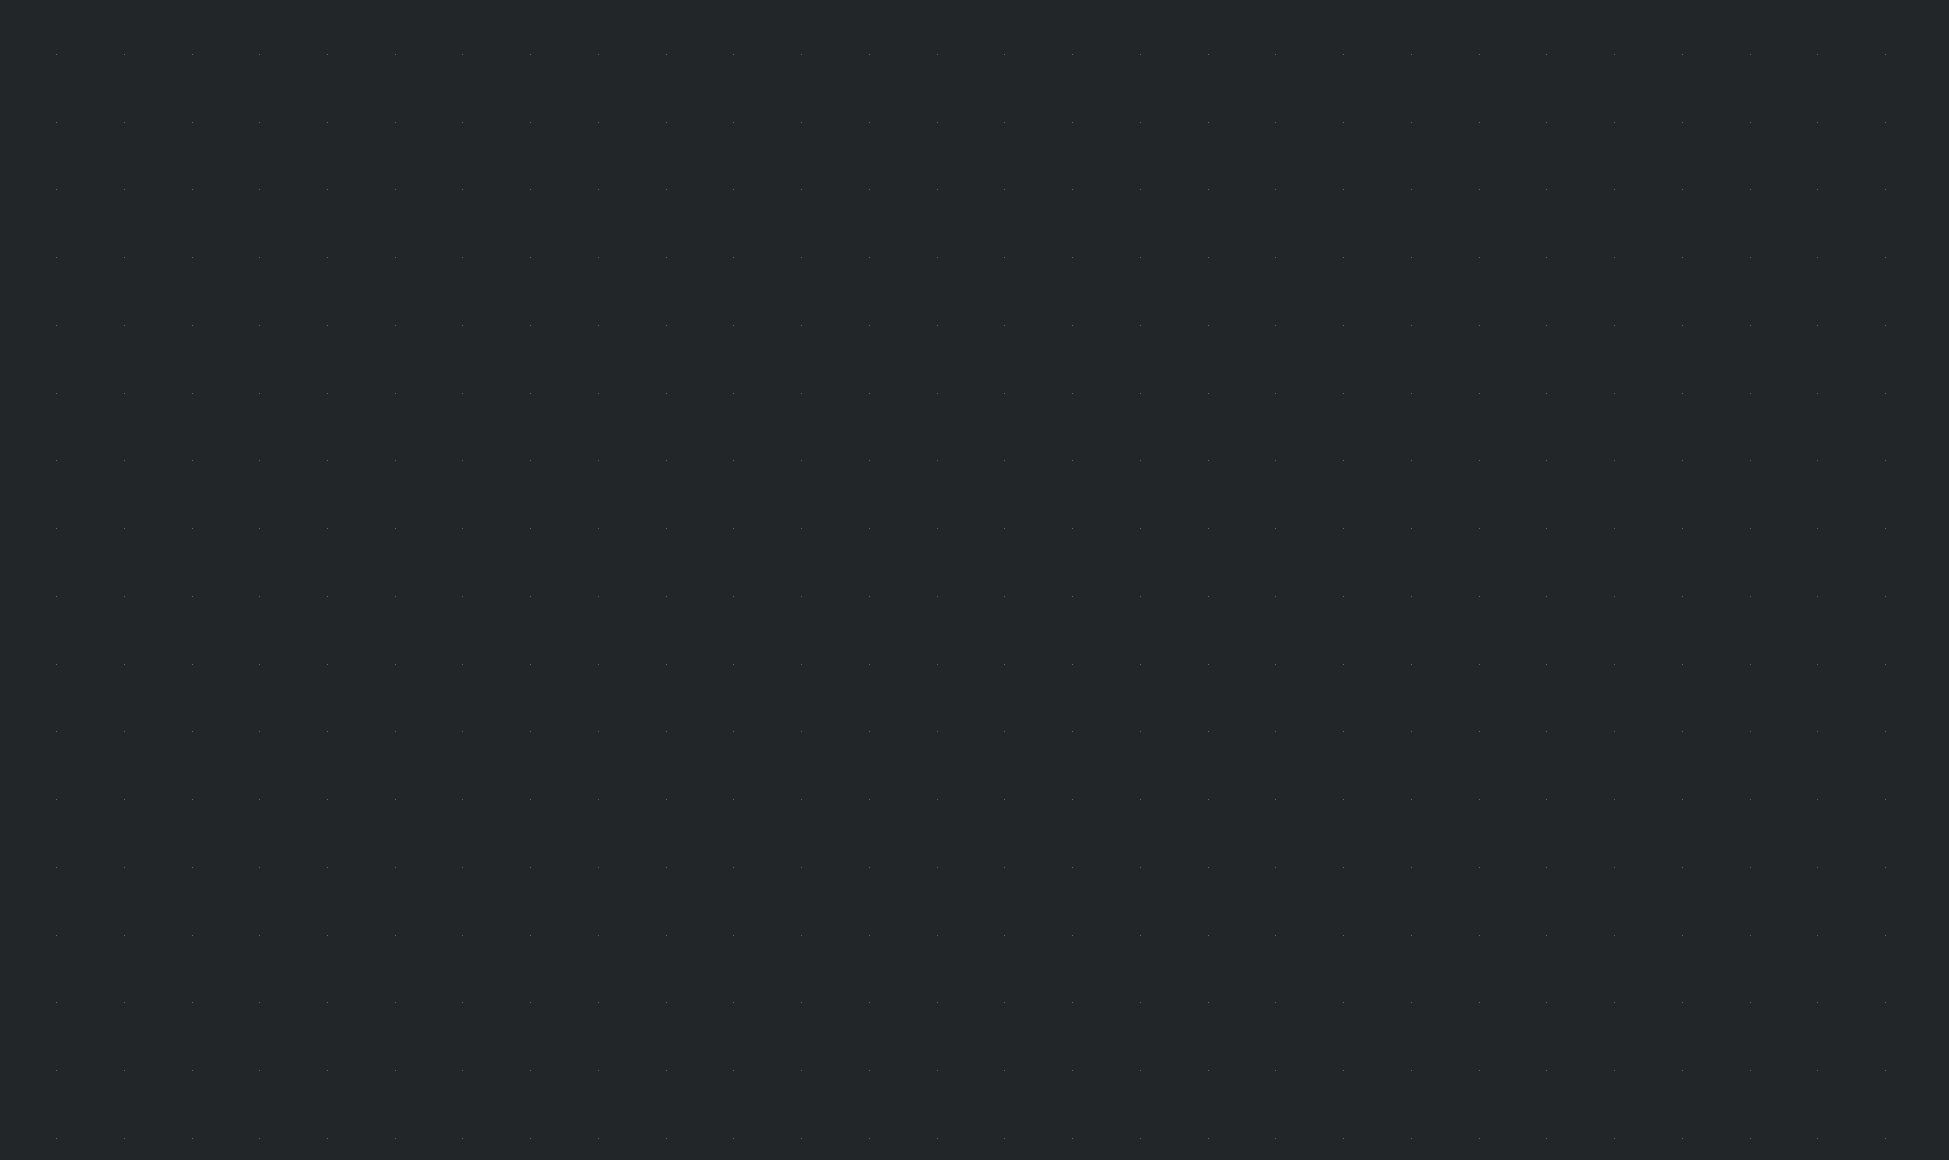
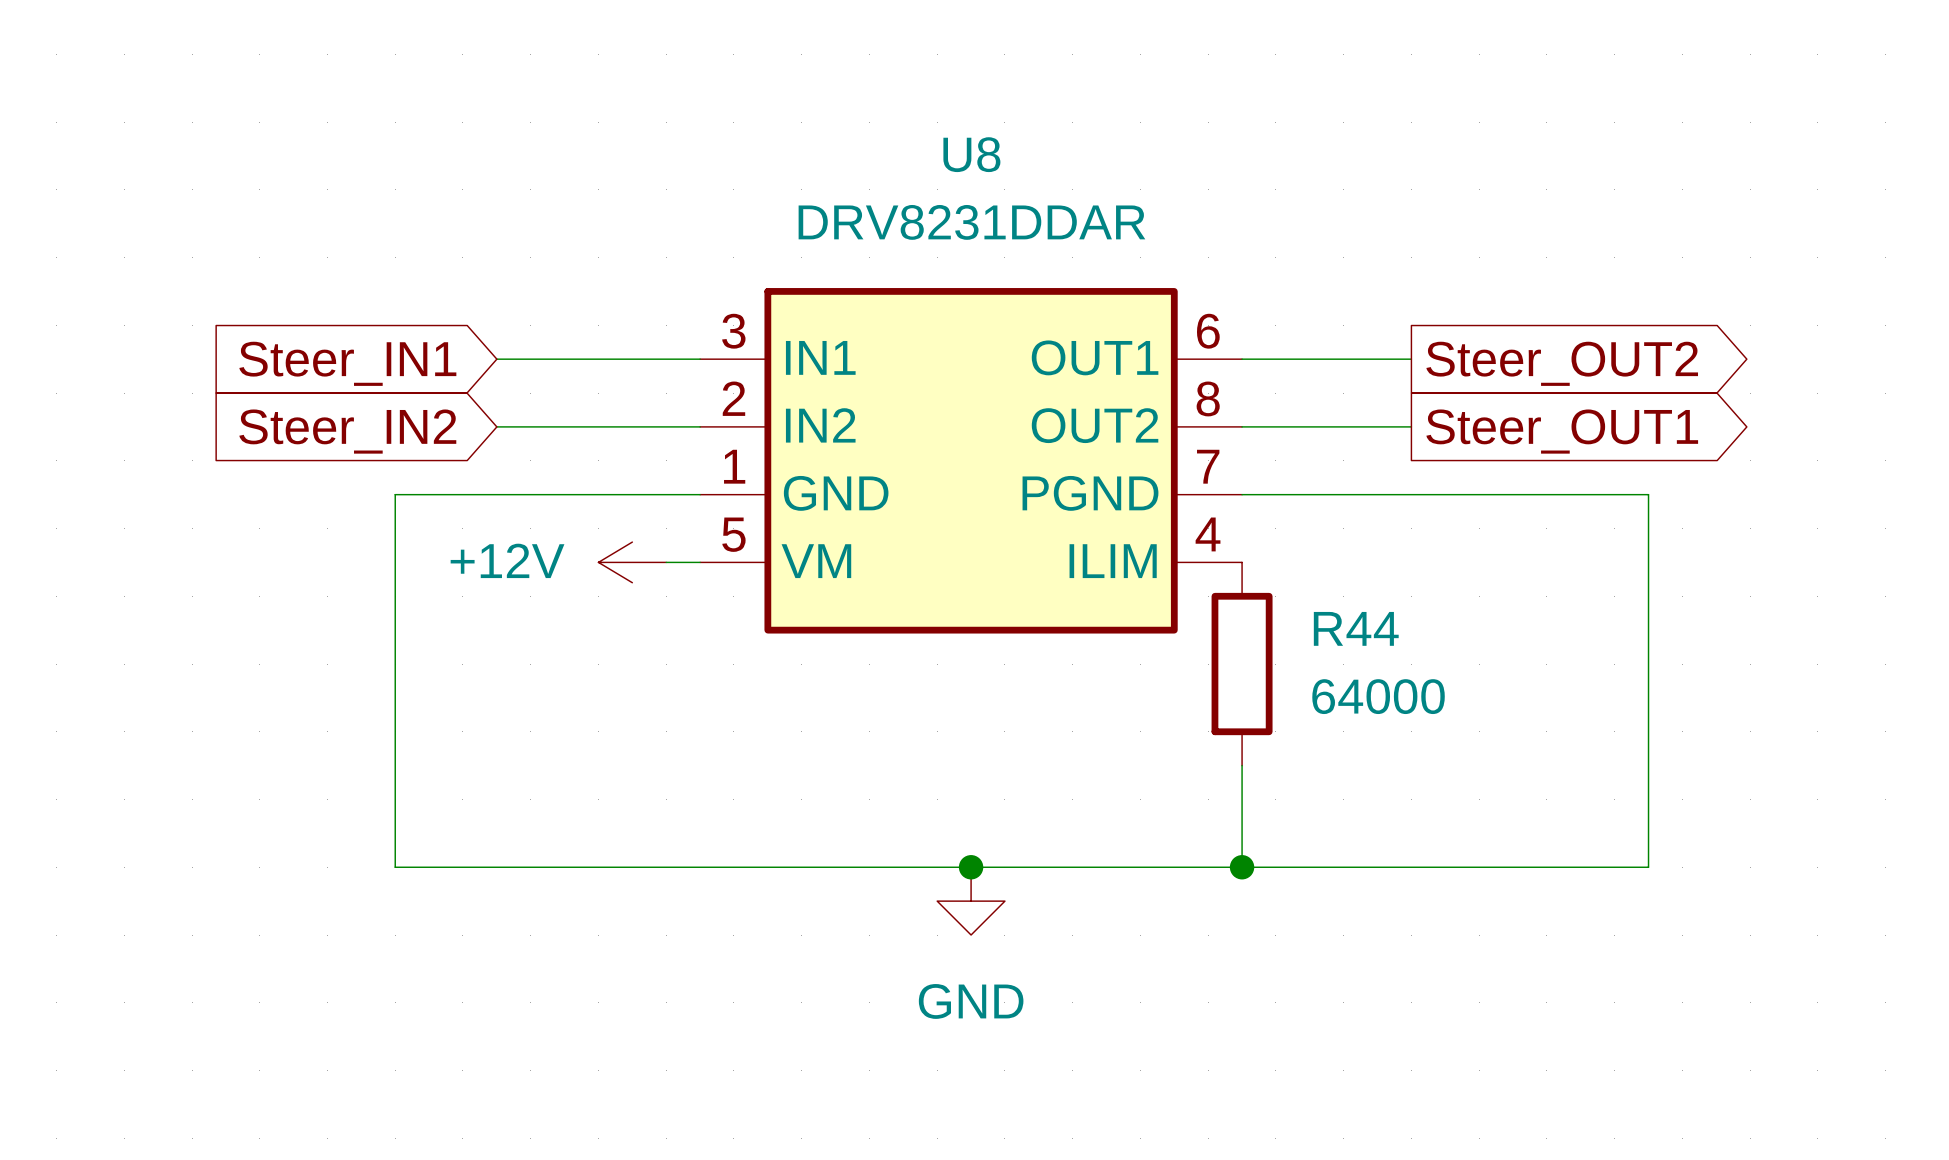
wire: none -> (496, 359) (700, 359)
wire: none -> (1242, 359) (1411, 359)
global label: none -> Steer_IN1 (347, 363)
global label: none -> Steer_OUT2 (1562, 363)
wire: none -> (496, 426) (700, 426)
wire: none -> (1242, 426) (1411, 426)
global label: none -> Steer_IN2 (347, 431)
global label: none -> Steer_OUT1 (1562, 431)
U8: none -> DRV8231DDAR (971, 460)
wire: none -> (700, 494) (395, 494) (395, 867) (1648, 867) (1648, 494) (1242, 494)
power symbol: none -> +12V (632, 562)
wire: none -> (666, 562) (700, 562)
R44: none -> 64000 (1242, 664)
wire: none -> (1242, 765) (1242, 867)
junction: none -> (971, 867)
junction: none -> (1242, 867)
power symbol: none -> GND (971, 901)

